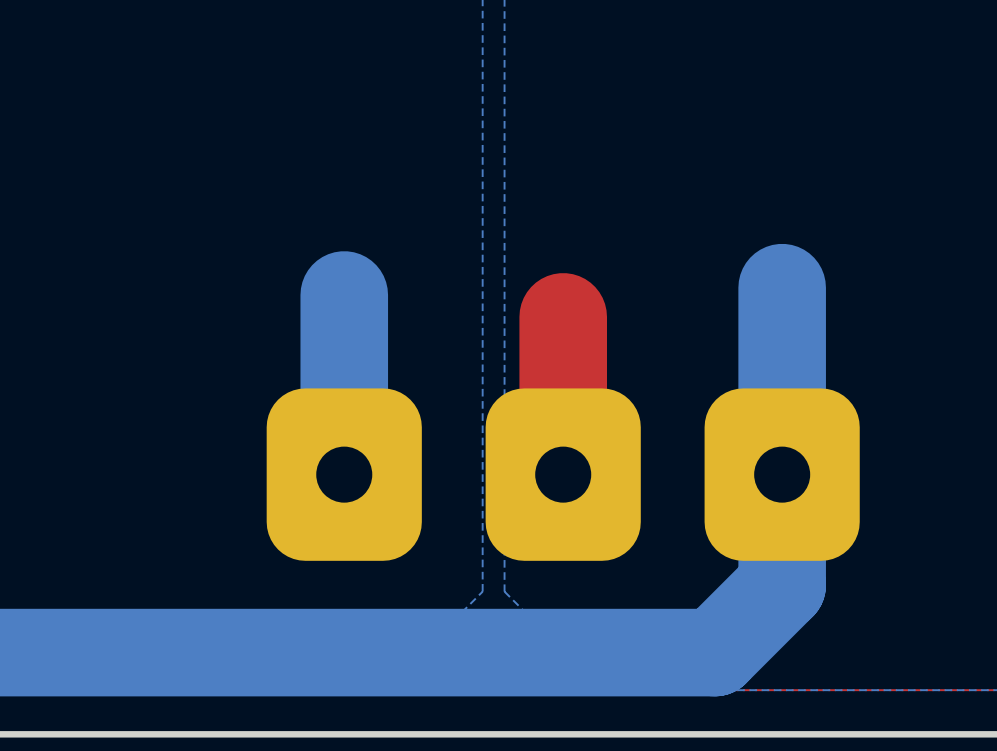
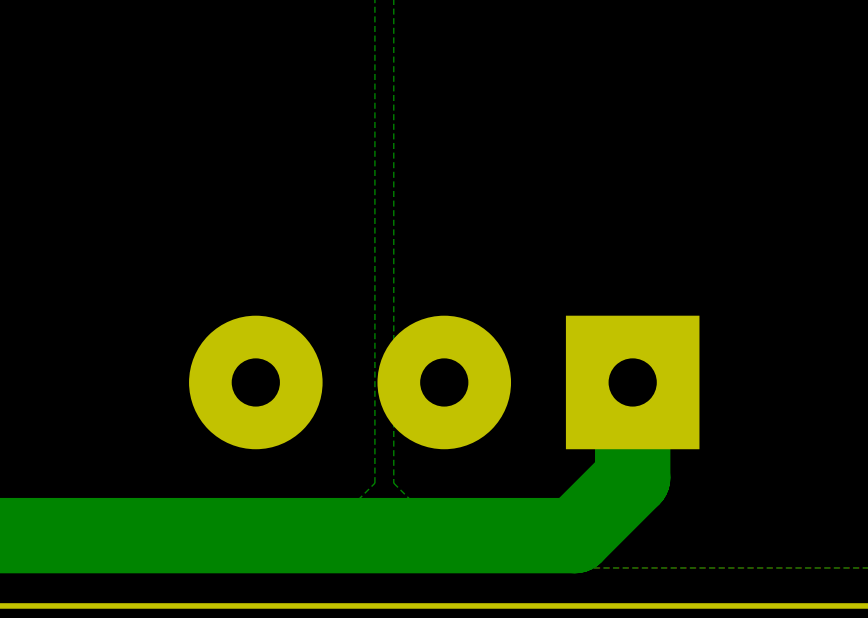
bottom track: (782, 287) (782, 474) -> none
bottom track: (344, 294) (344, 474) -> none
top track: (563, 316) (563, 474) -> none
part footprint: [266, 388, 860, 561] -> [189, 315, 700, 450]

